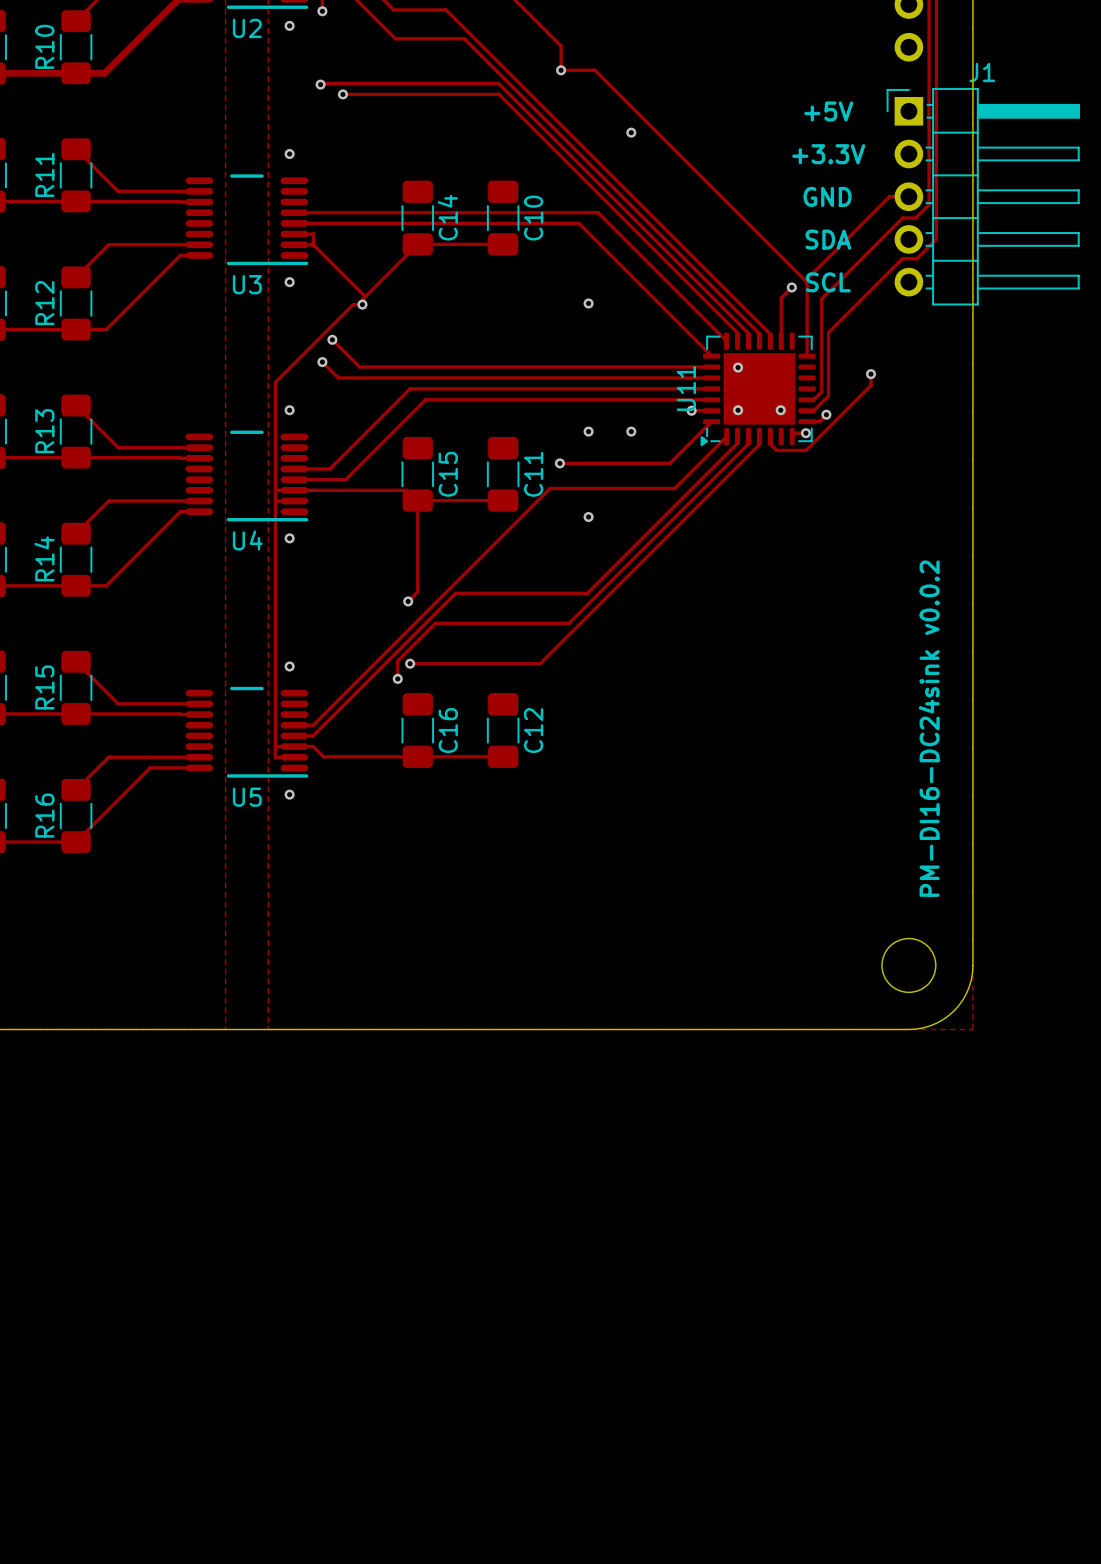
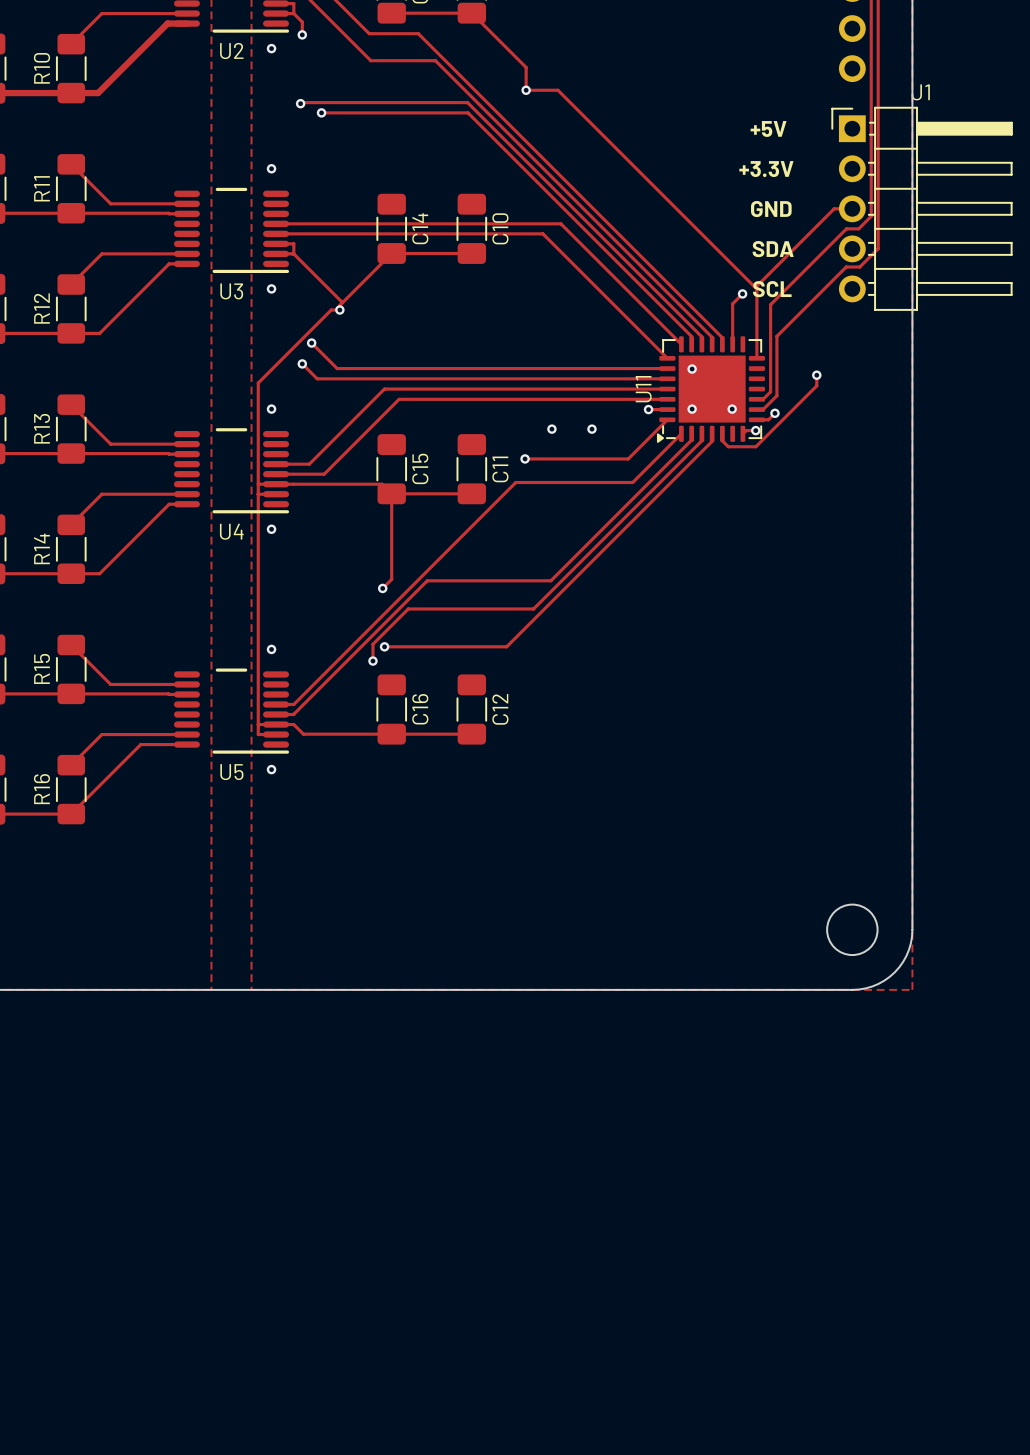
via: (631, 132) -> none
via: (588, 303) -> none
via: (588, 517) -> none
text: PM-DI16-DC24sink v0.0.2 (929, 728) -> none

